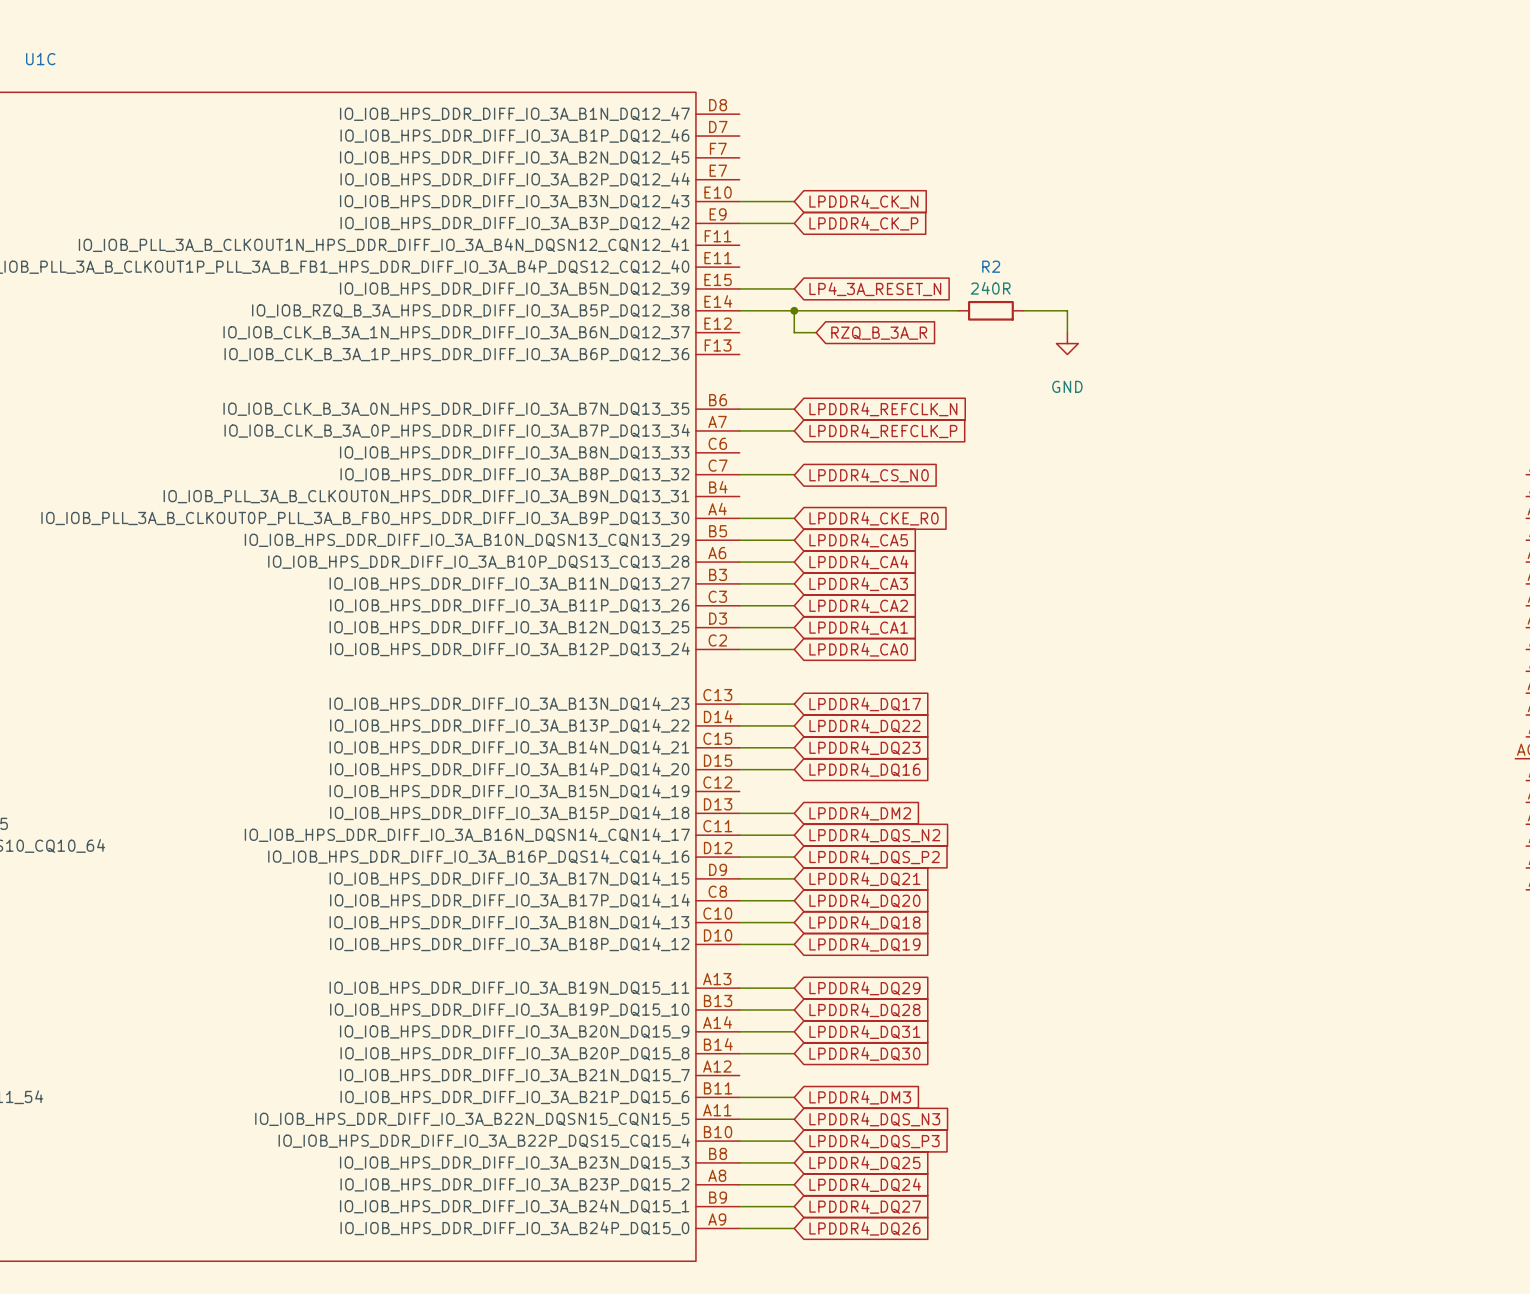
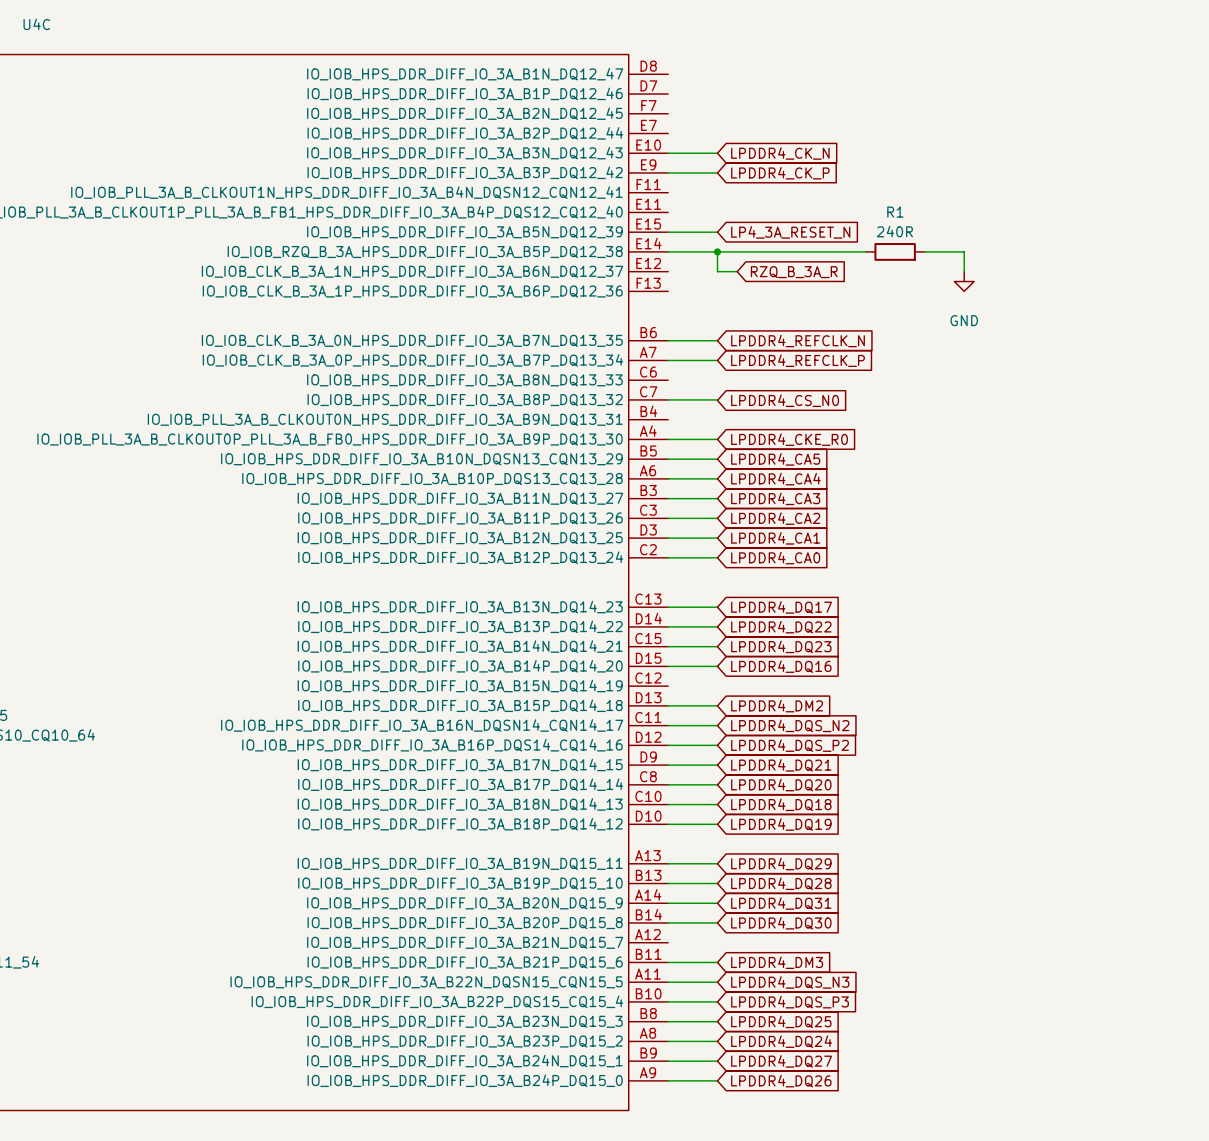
U1C name: U1C (40, 59) -> U4C (36, 24)
R2 name: R2 (991, 266) -> R1 (895, 212)

